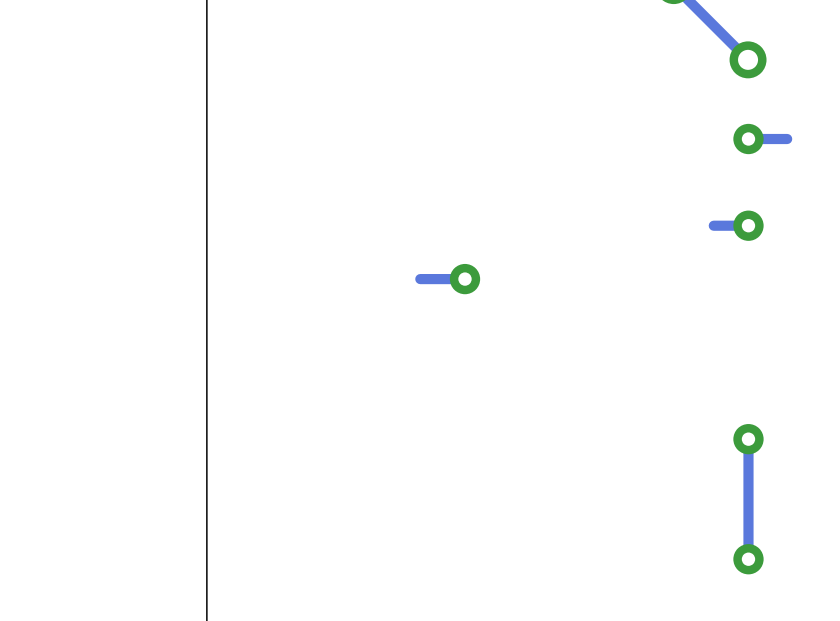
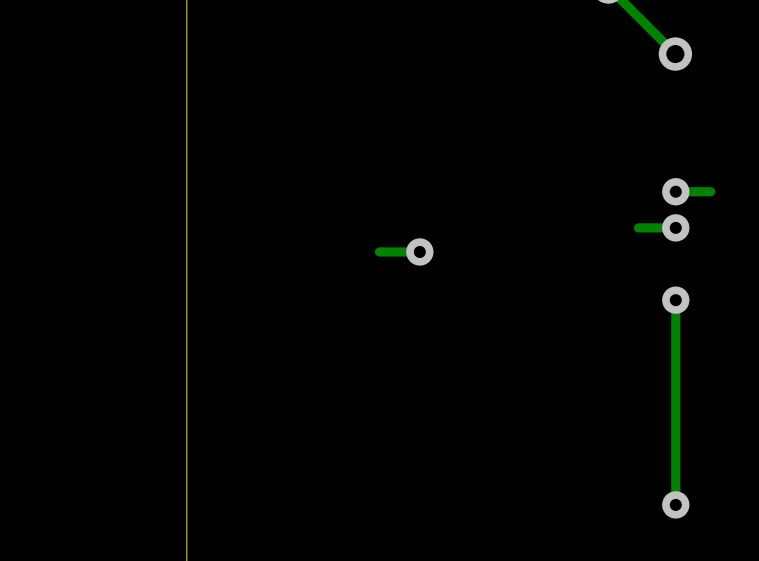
via: (748, 139) -> none
track: (787, 139) (748, 139) -> (710, 191) (675, 191)
via: none -> (675, 191)
track: (748, 225) (713, 225) -> none
via: (748, 225) -> none
track: none -> (675, 227) (638, 227)
via: none -> (675, 227)
track: none -> (675, 300) (675, 396)
via: none -> (675, 300)
via: (748, 439) -> none

